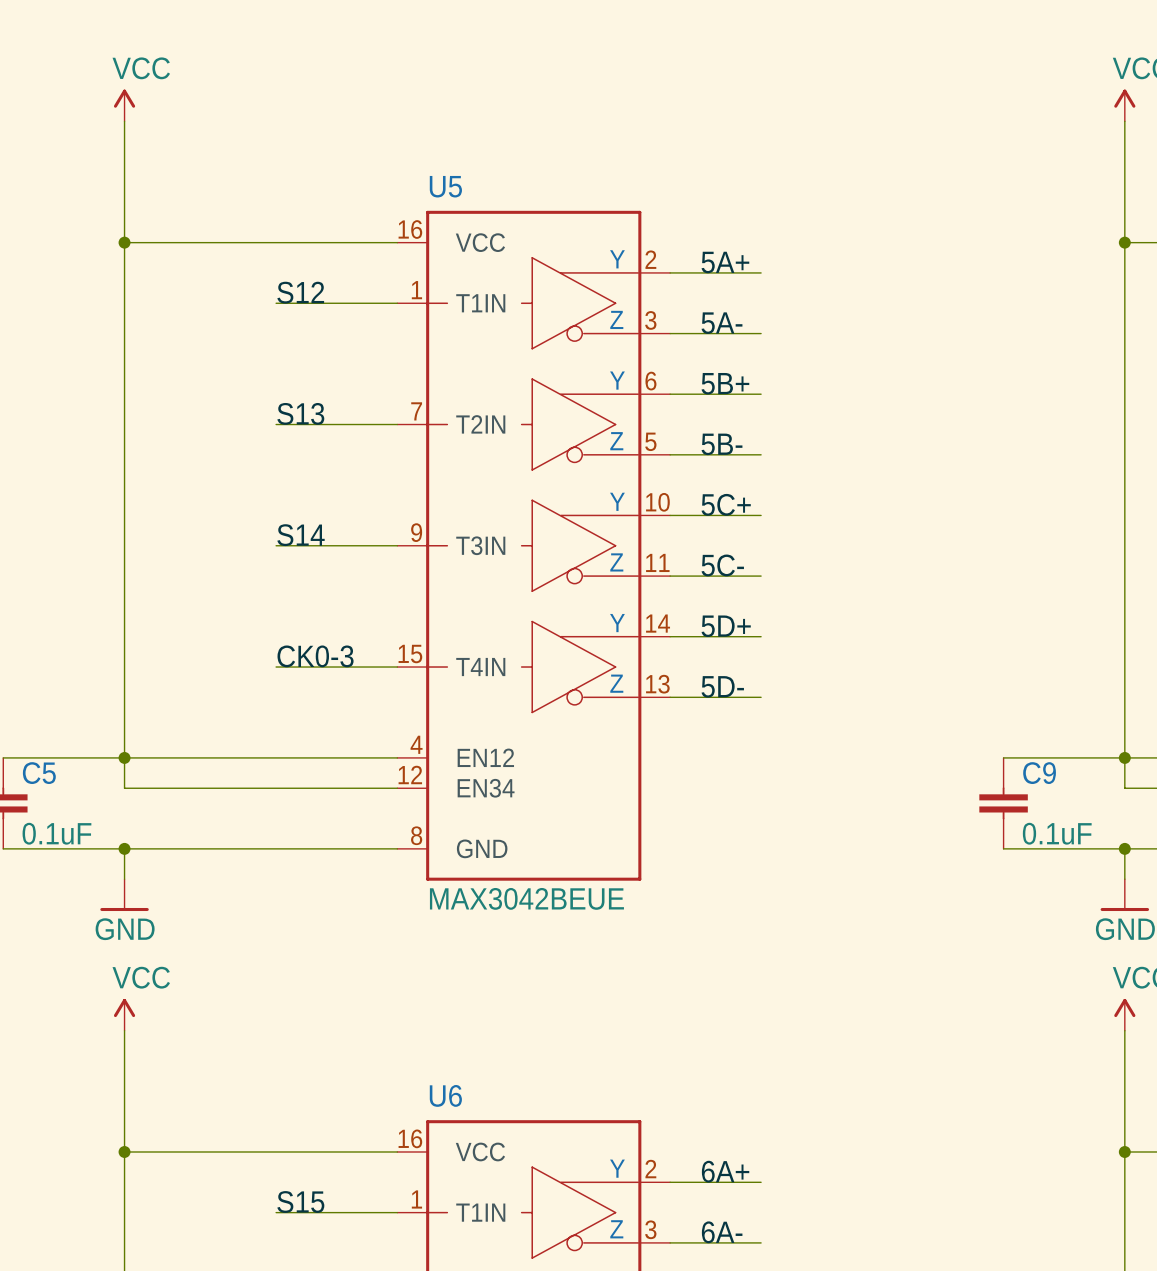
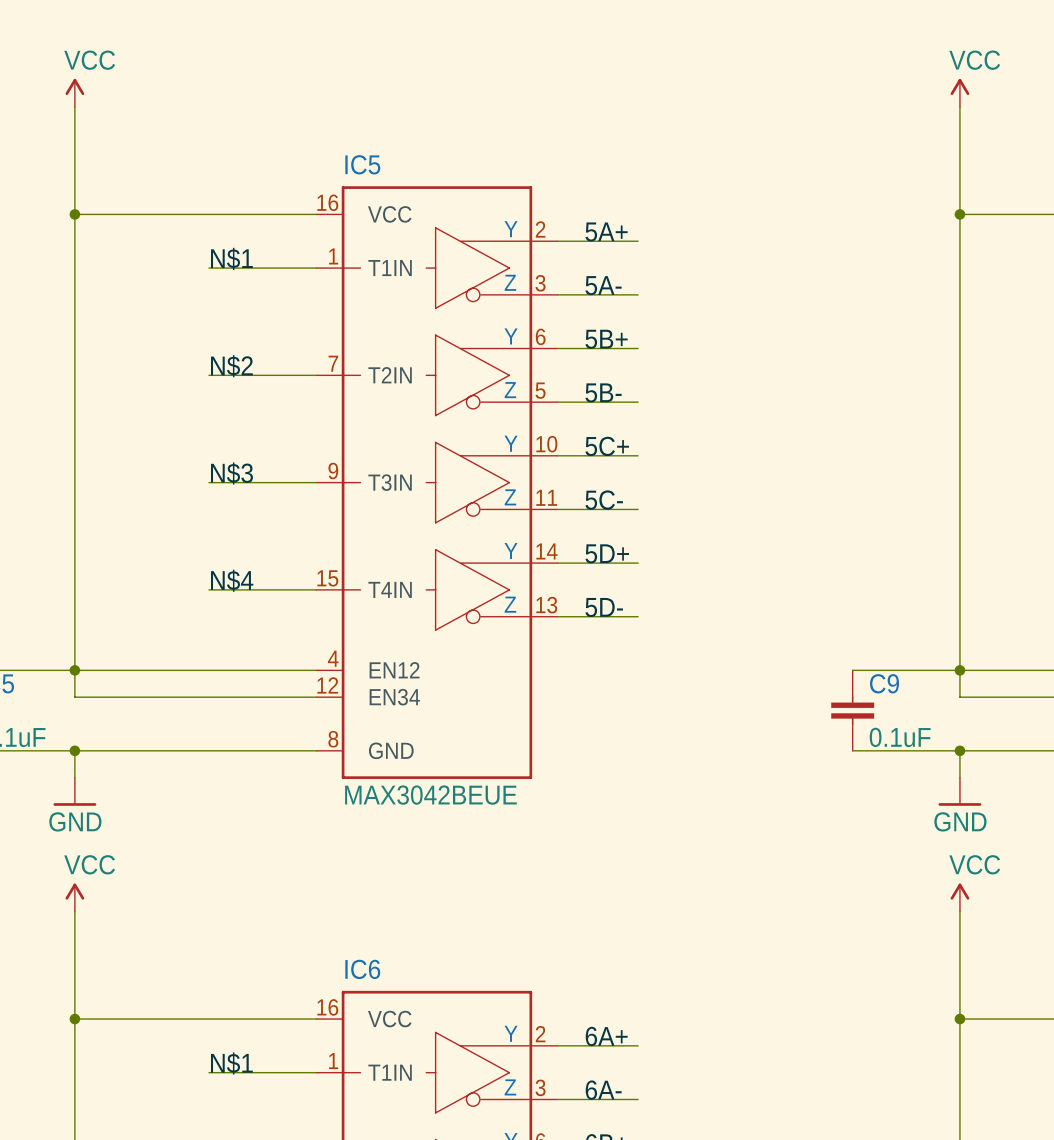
U5 name: U5 (445, 186) -> IC5 (362, 164)
label: S12 (300, 292) -> N$1 (231, 258)
label: S13 (300, 413) -> N$2 (231, 366)
label: S14 (301, 535) -> N$3 (231, 473)
label: CK0-3 (315, 656) -> N$4 (232, 580)
U6 name: U6 (445, 1095) -> IC6 (362, 969)
label: S15 (300, 1202) -> N$1 (231, 1063)

